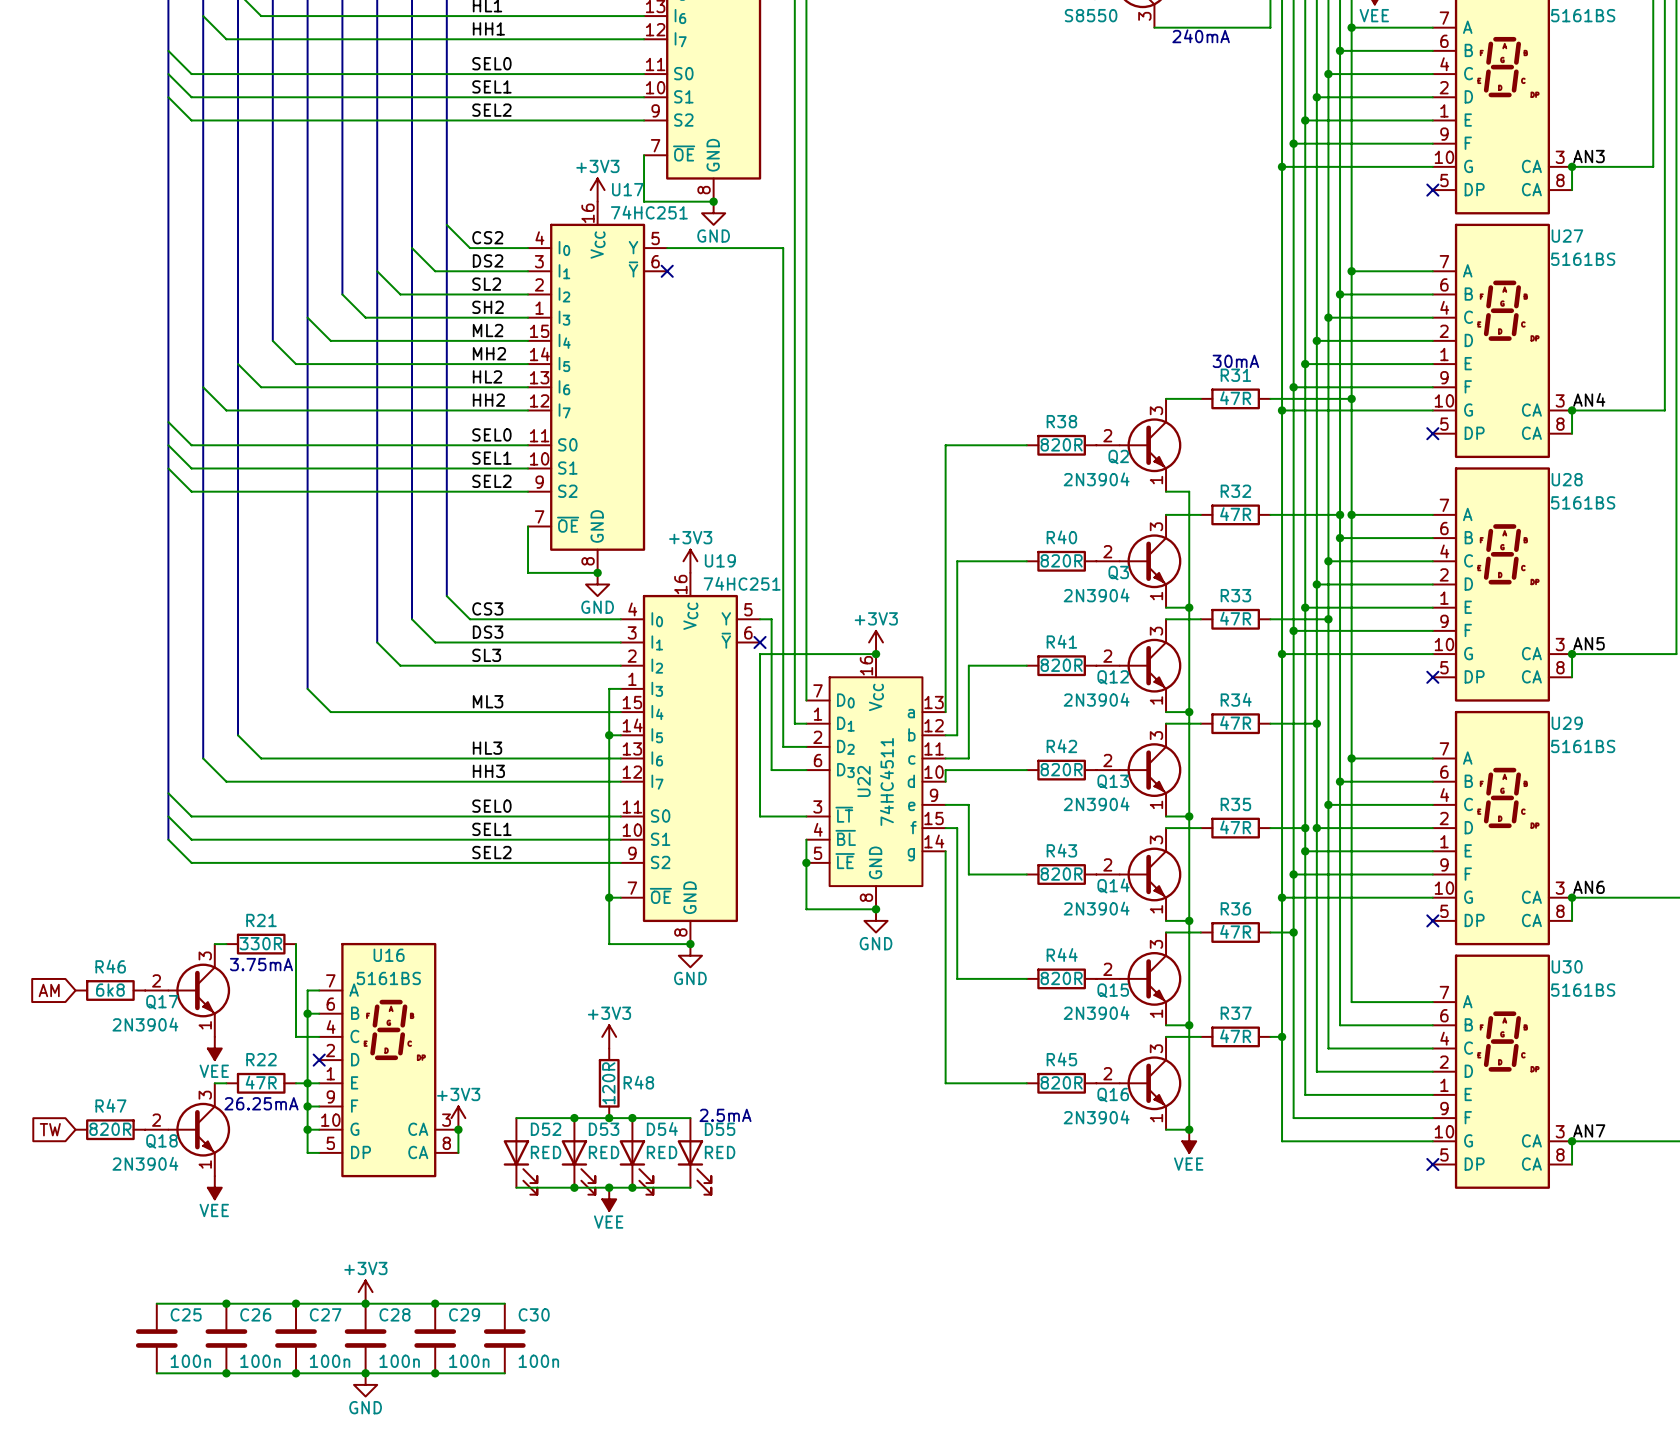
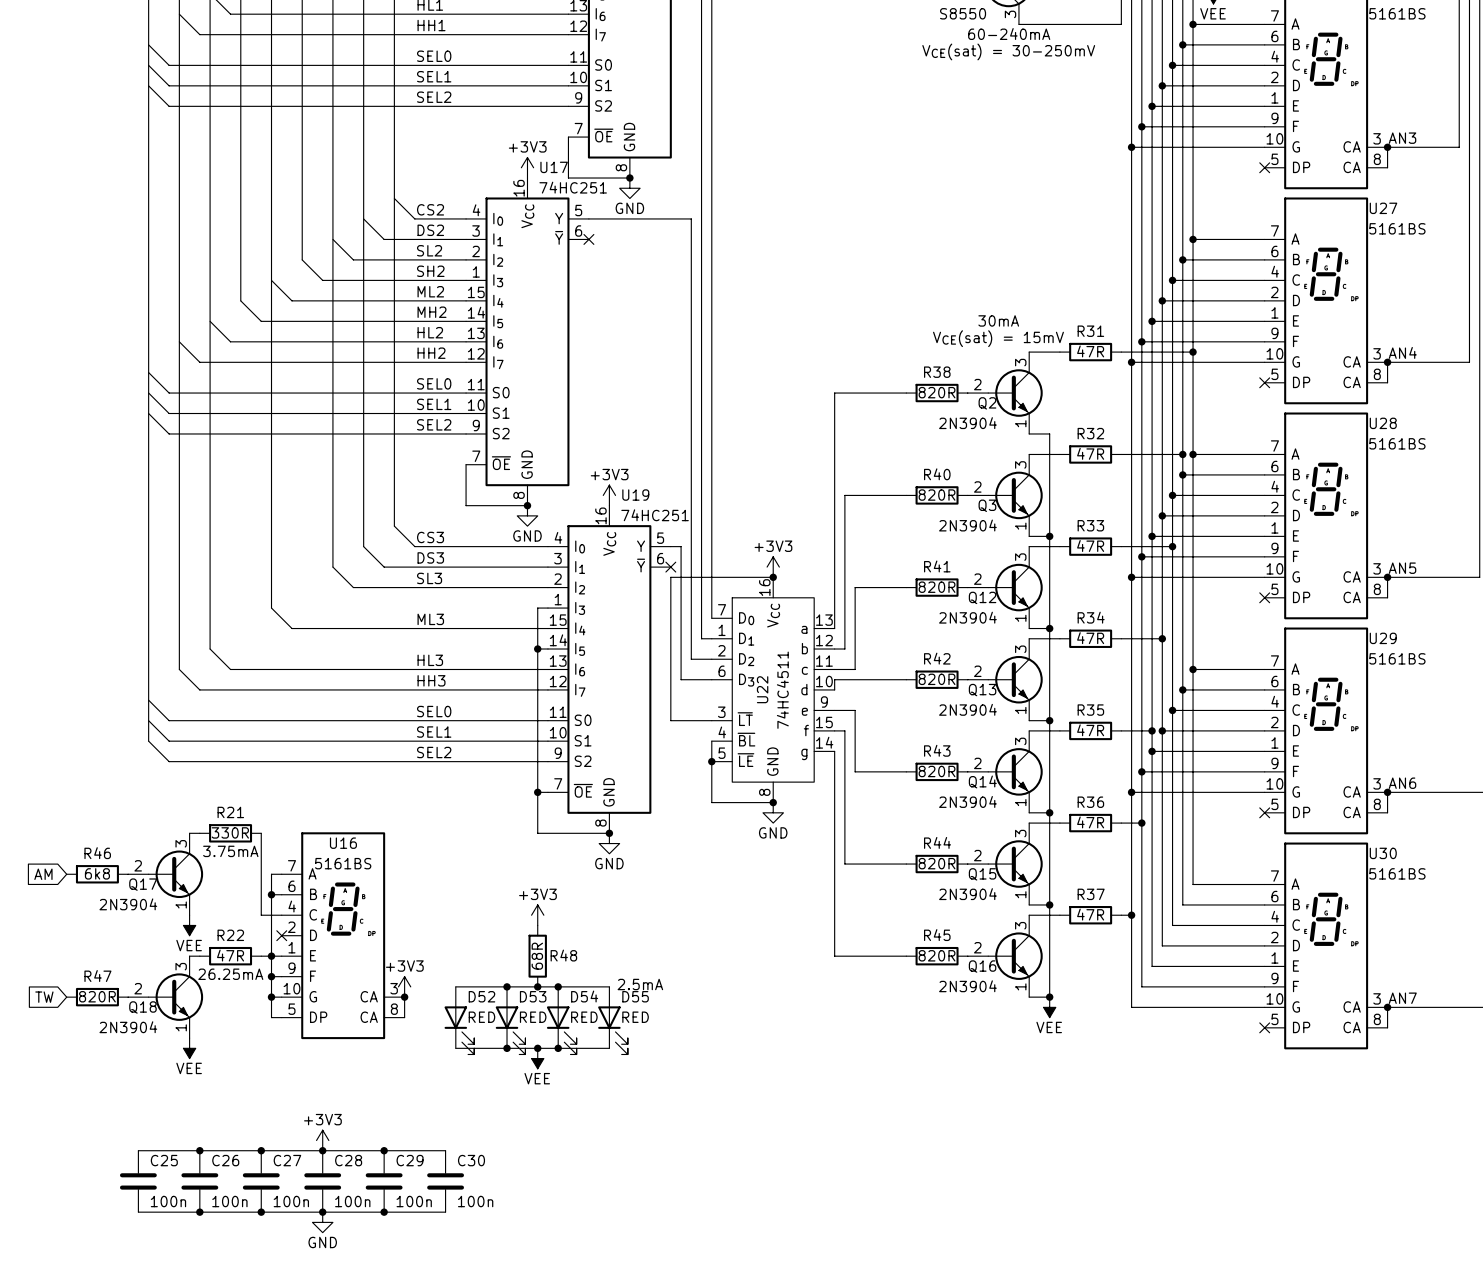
text: 240mA (1201, 36) -> 60-240mA (1009, 34)
text: none -> VCE(sat) = 30-250mV (1008, 51)
text position: 30mA (1235, 361) -> 30mA (998, 320)
text: none -> VCE(sat) = 15mV (998, 338)
R48 value: 120R (608, 1083) -> 68R (537, 956)

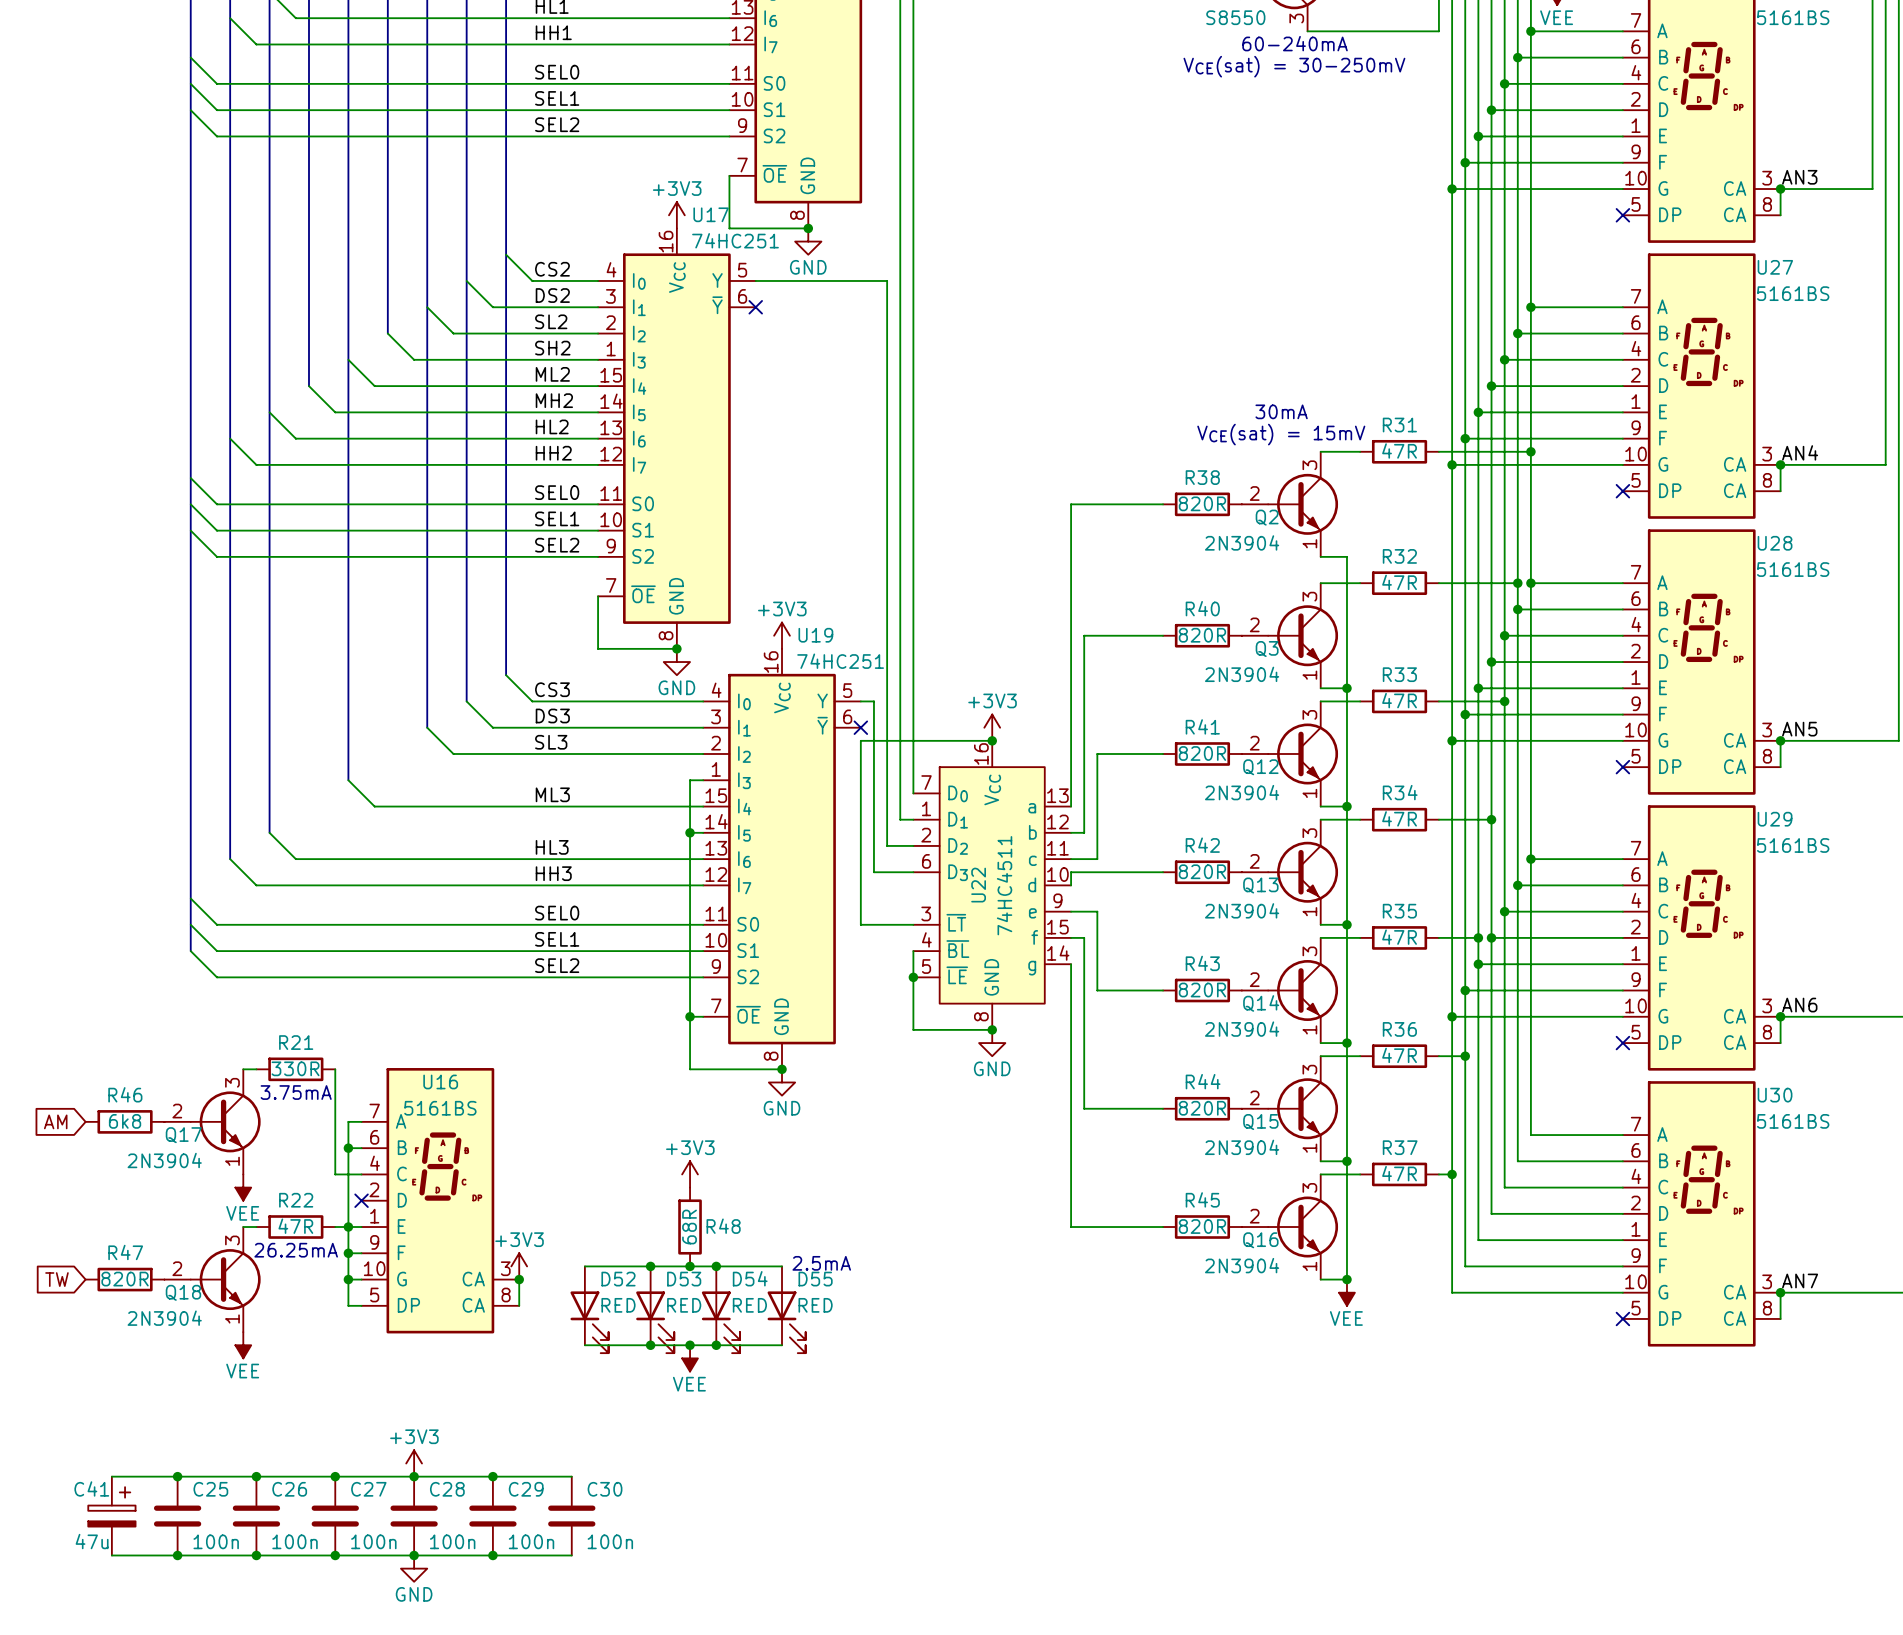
wire: none -> (111, 1476) (177, 1476)
junction: none -> (177, 1476)
C41: none -> 47u (111, 1516)
wire: none -> (111, 1555) (177, 1555)
junction: none -> (177, 1555)

